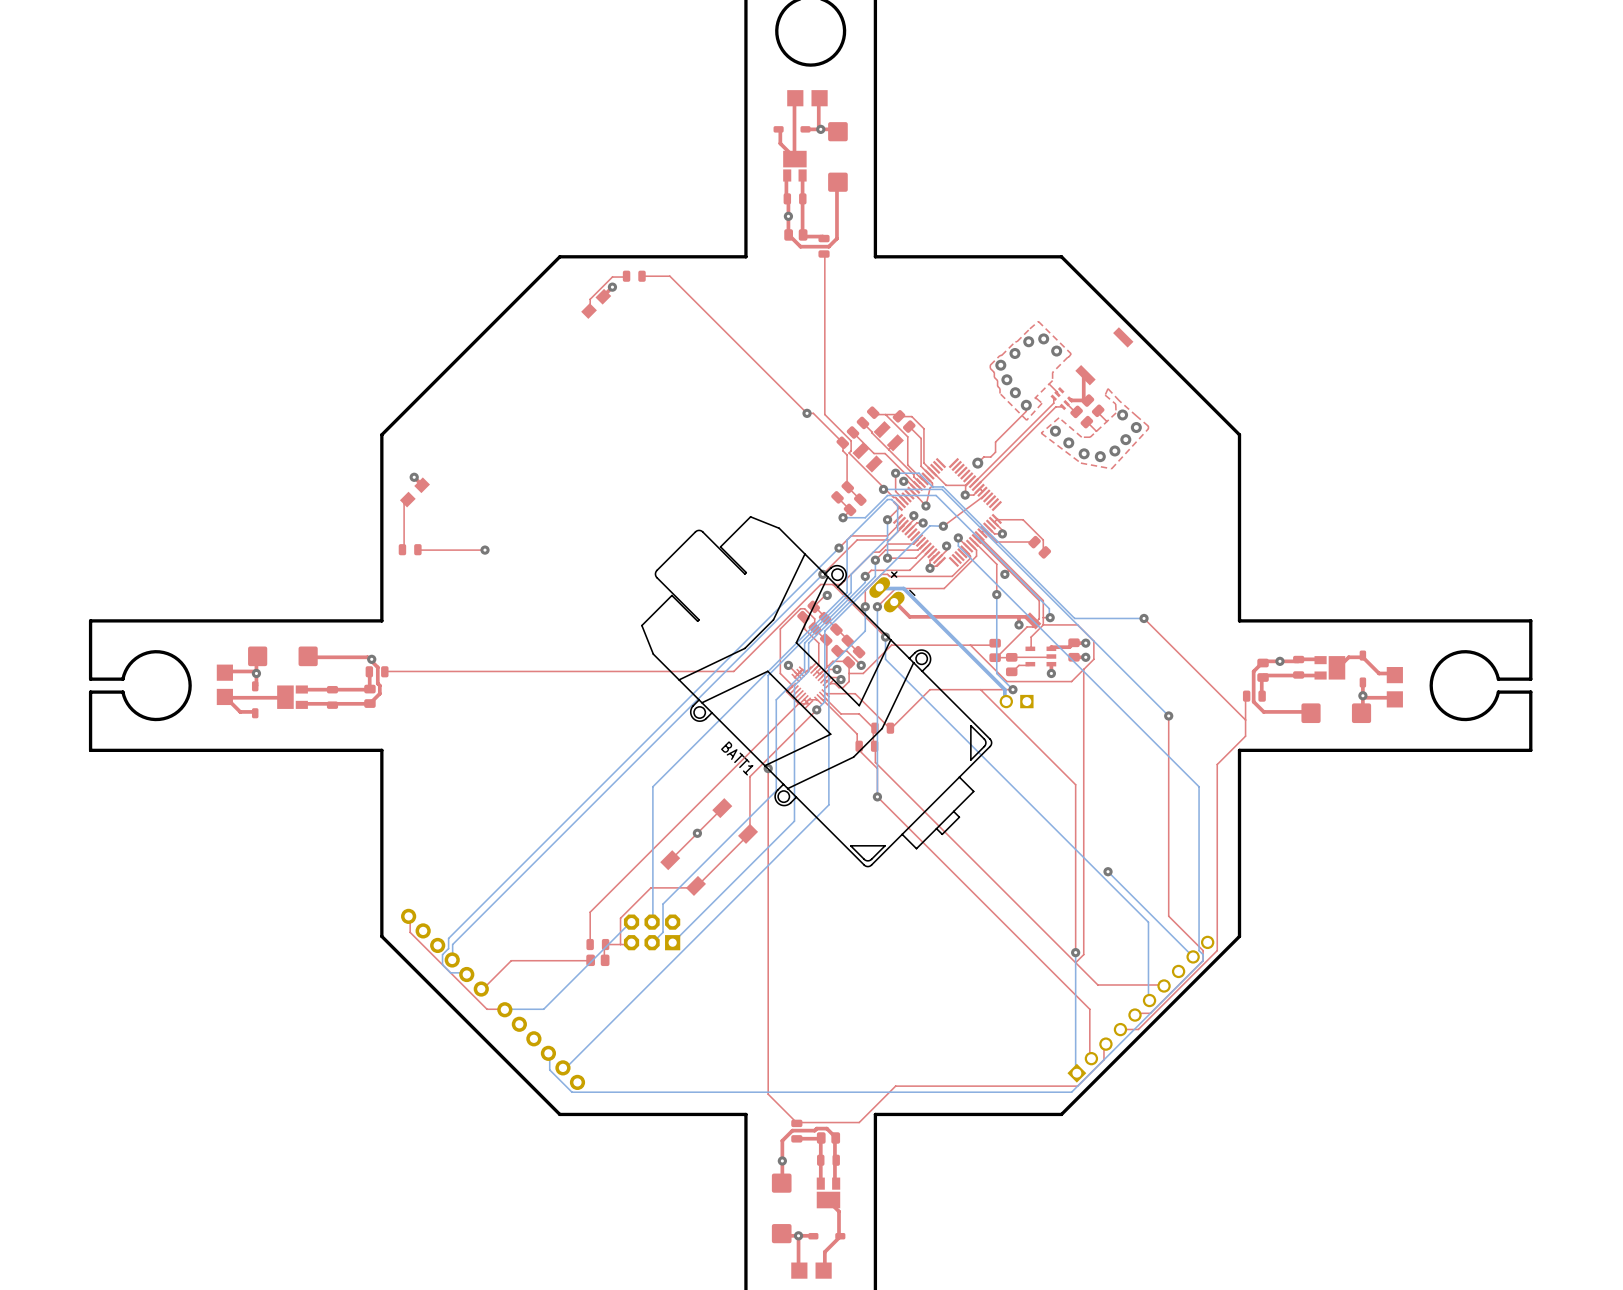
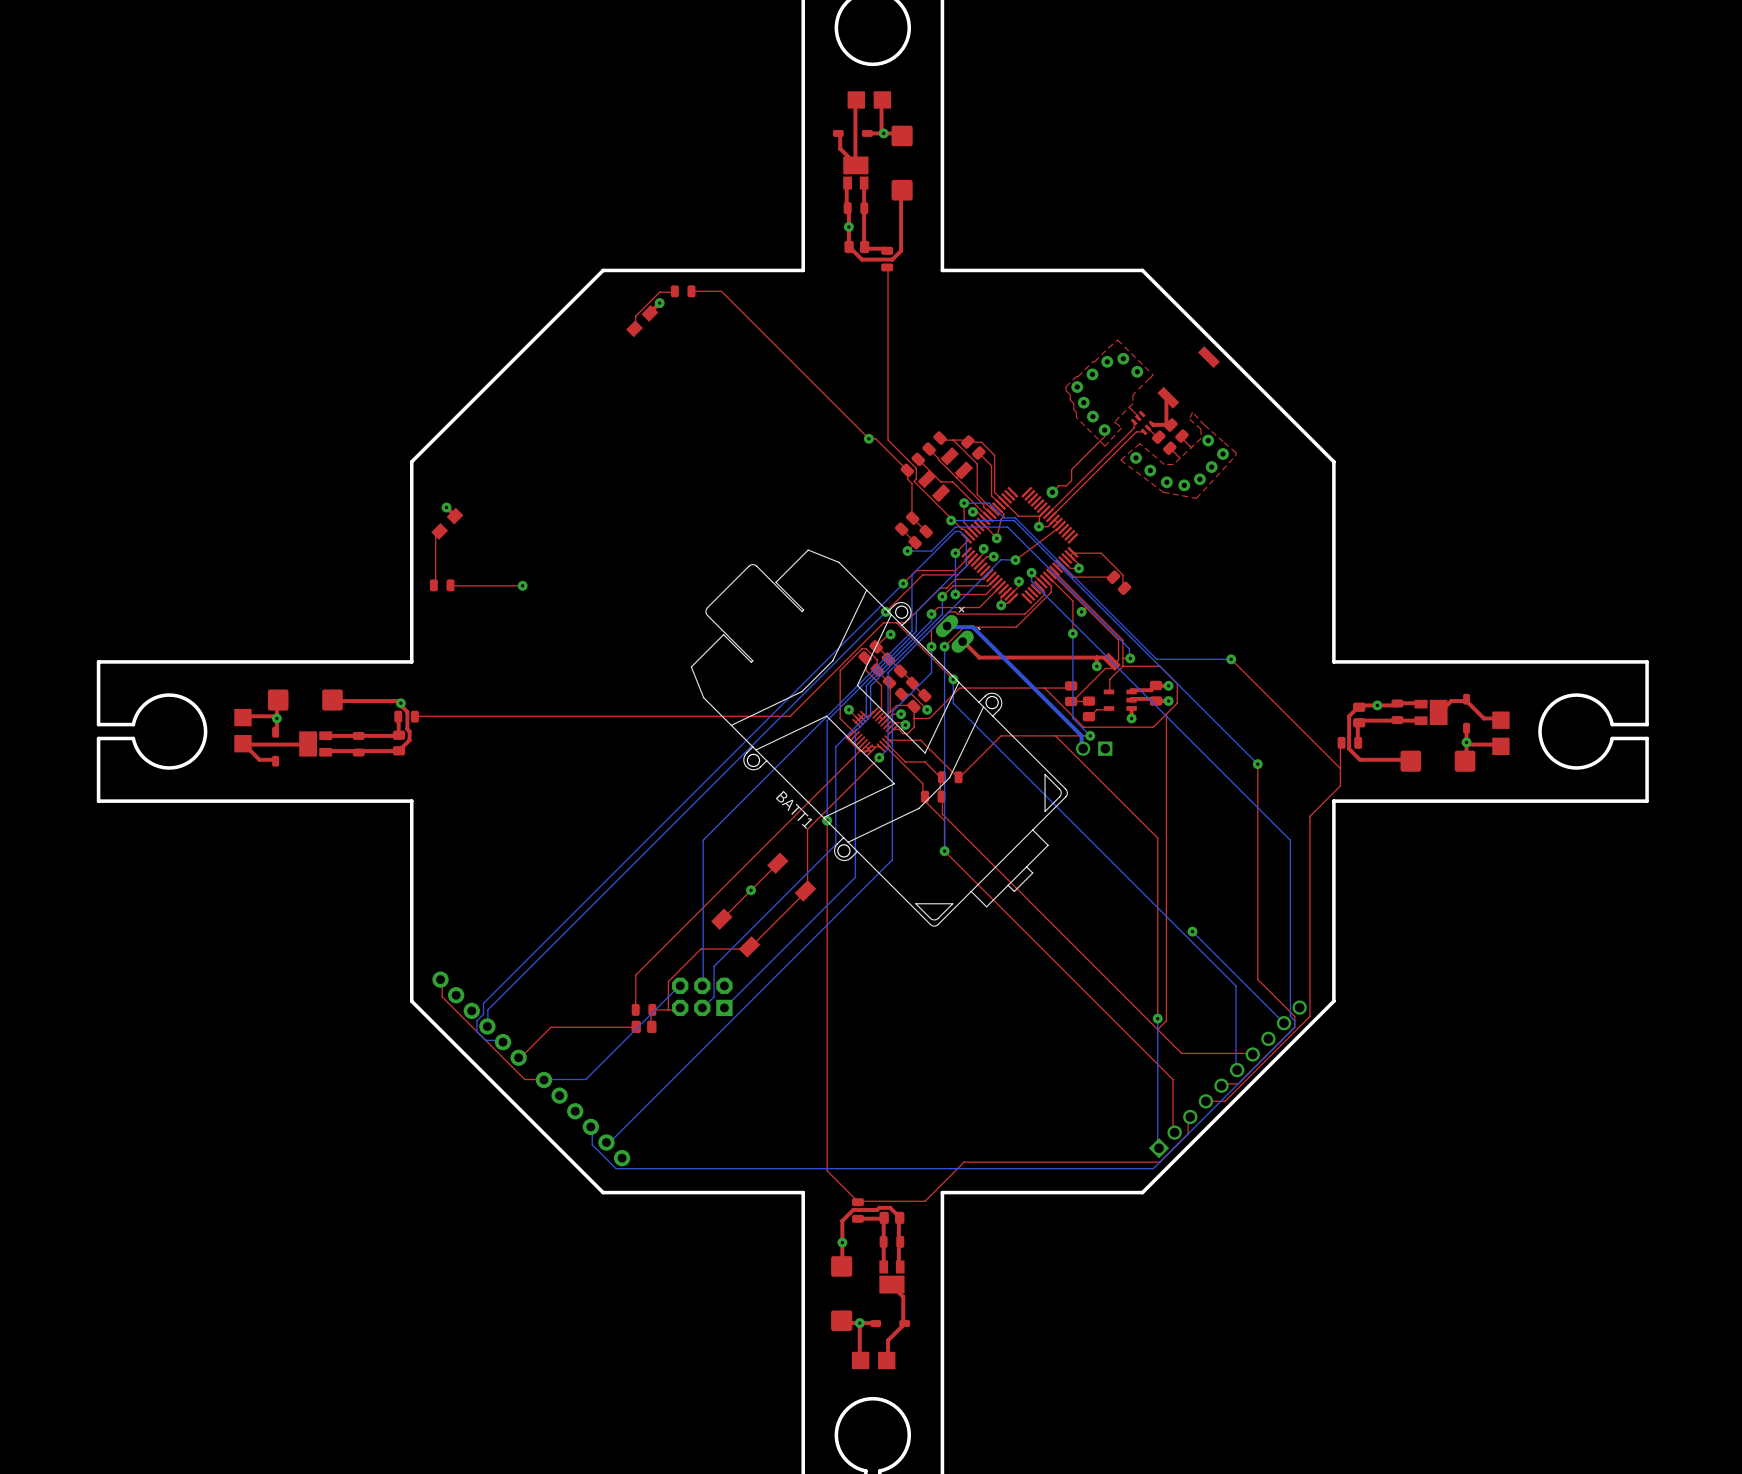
top track: (1051, 656) (1011, 657) -> (1131, 700) (1155, 698) (1155, 701)

